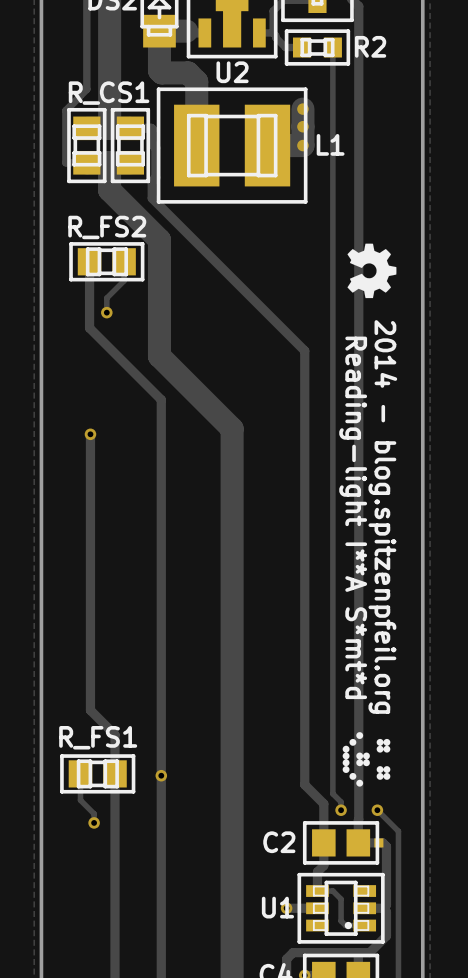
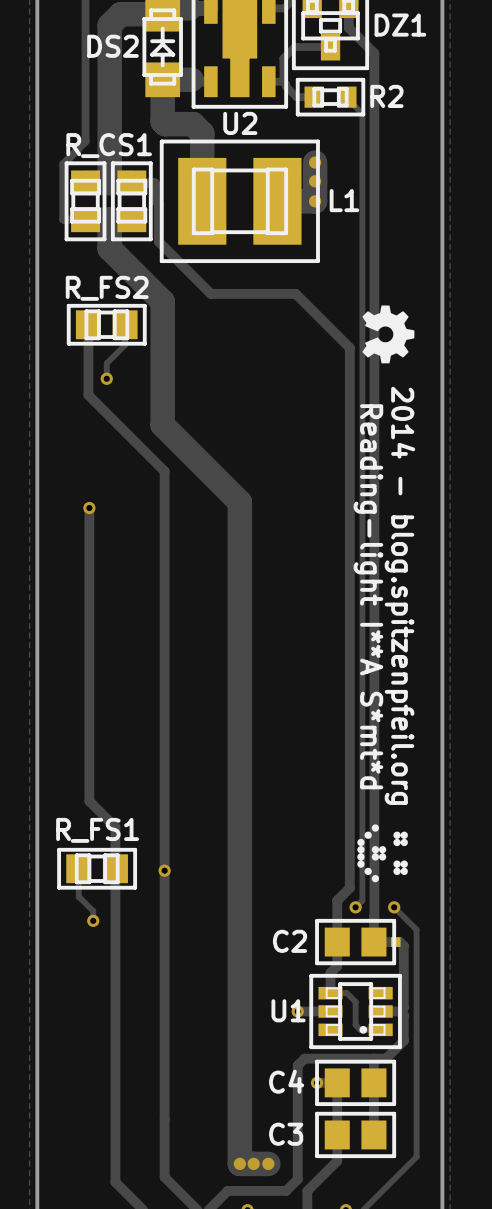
track: (332, 48) (332, 793) (341, 802) (341, 810) -> (346, 98) (362, 113) (362, 900) (355, 907)
track: (155, 177) (152, 181) (152, 198) (304, 350) (304, 784) (323, 803) -> (158, 235) (158, 241) (210, 293) (295, 293) (349, 347) (349, 888) (337, 900)

